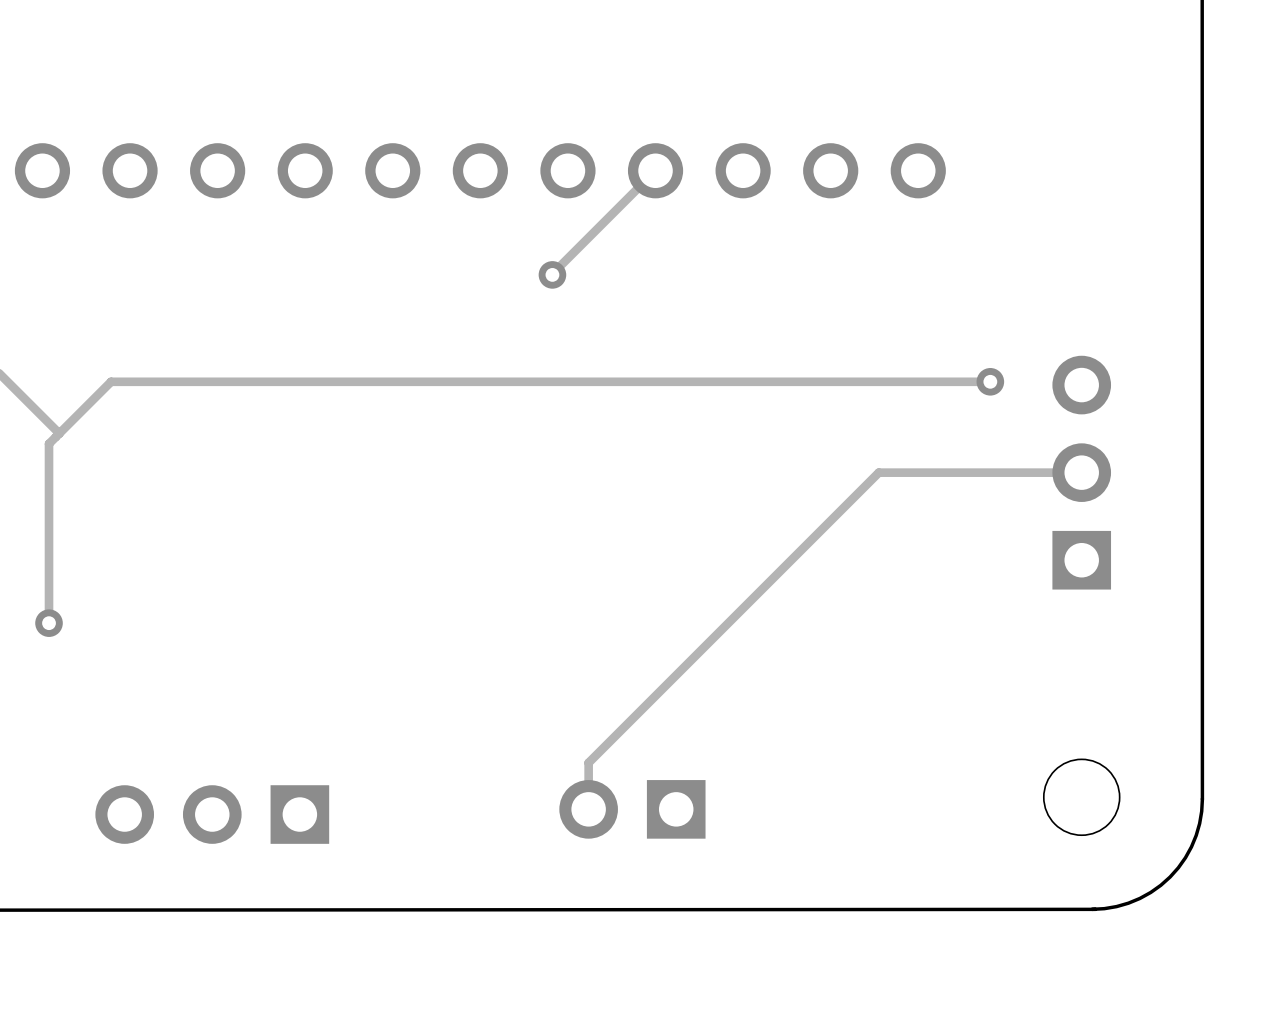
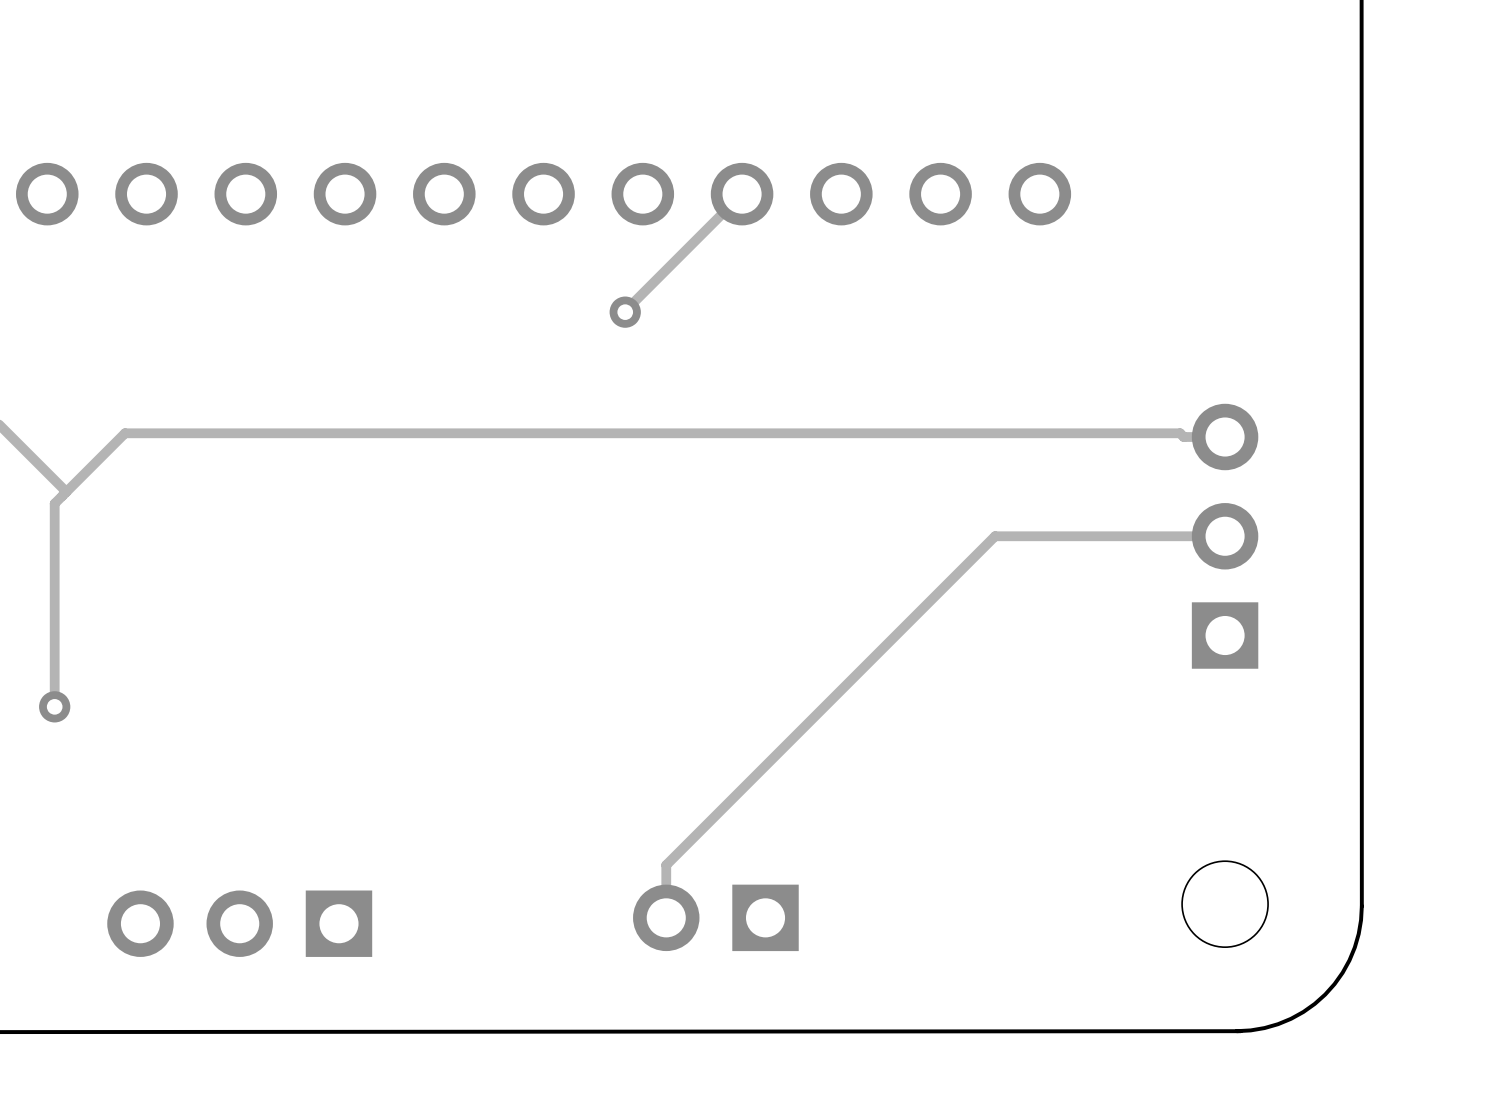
track: none -> (1121, 433) (1180, 433) (1183, 437) (1225, 437)
via: (990, 381) -> none

